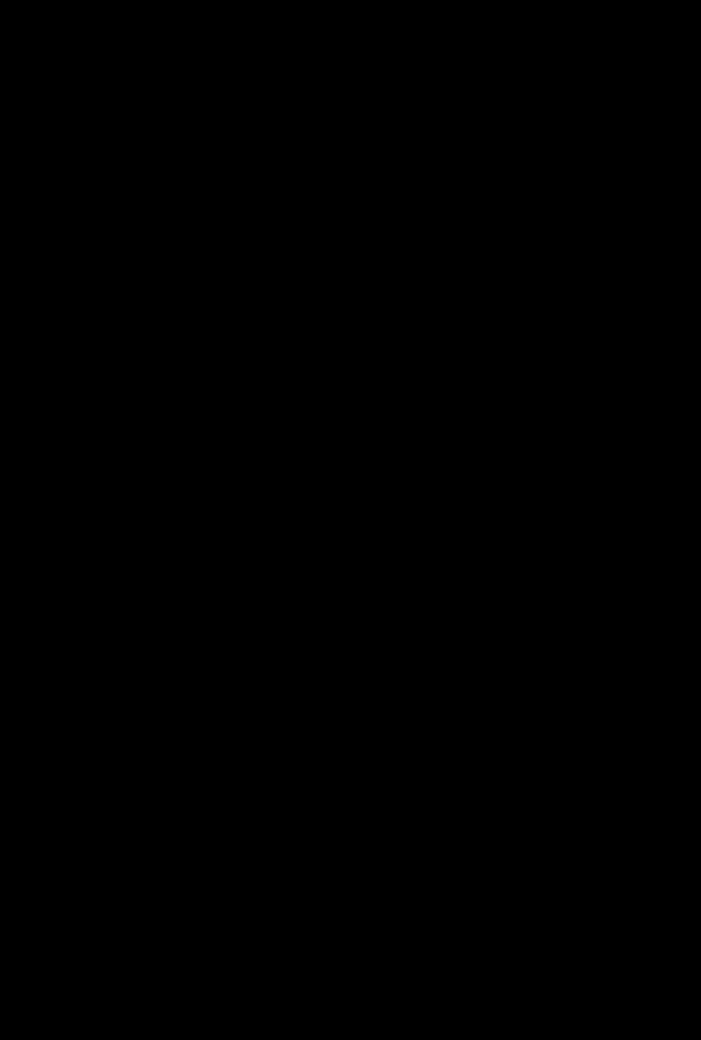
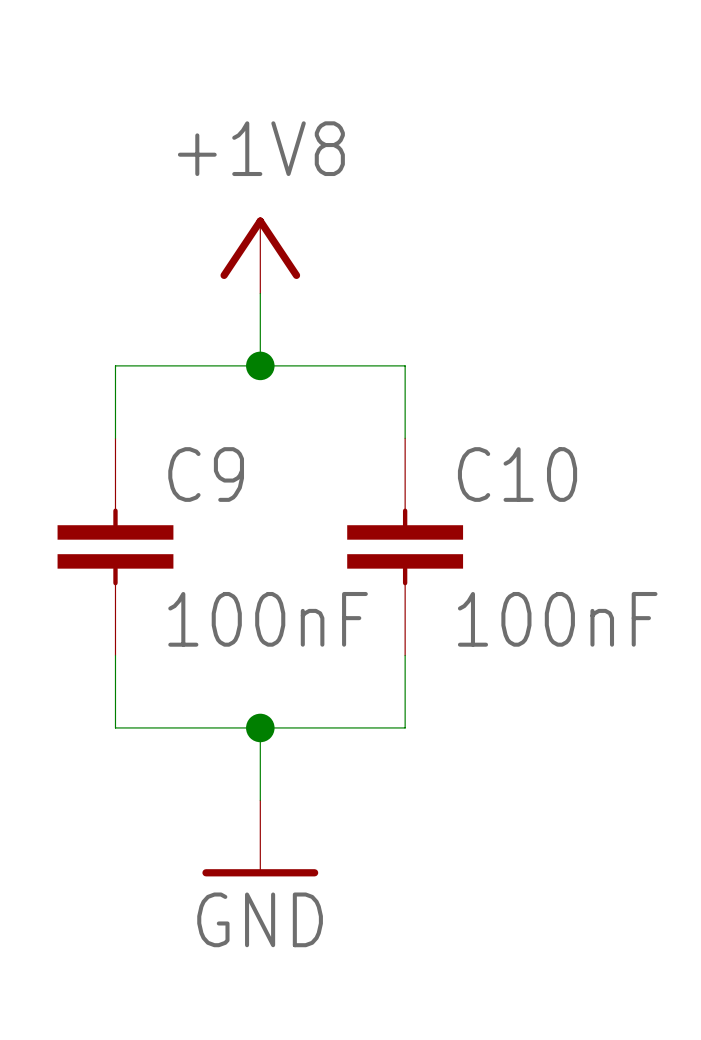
power symbol: none -> +1V8 (260, 255)
wire: none -> (260, 293) (260, 365)
junction: none -> (260, 365)
wire: none -> (115, 438) (115, 365) (405, 365) (405, 438)
C9: none -> 100nF (115, 546)
C10: none -> 100nF (405, 546)
wire: none -> (115, 655) (115, 727) (405, 727) (405, 655)
wire: none -> (260, 727) (260, 800)
junction: none -> (260, 727)
power symbol: none -> GND (260, 838)

